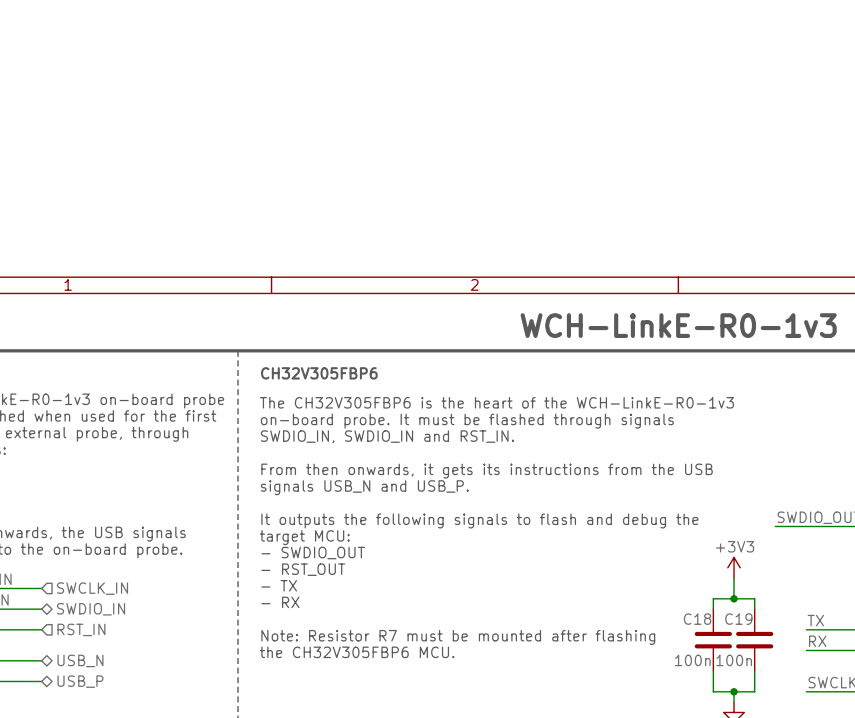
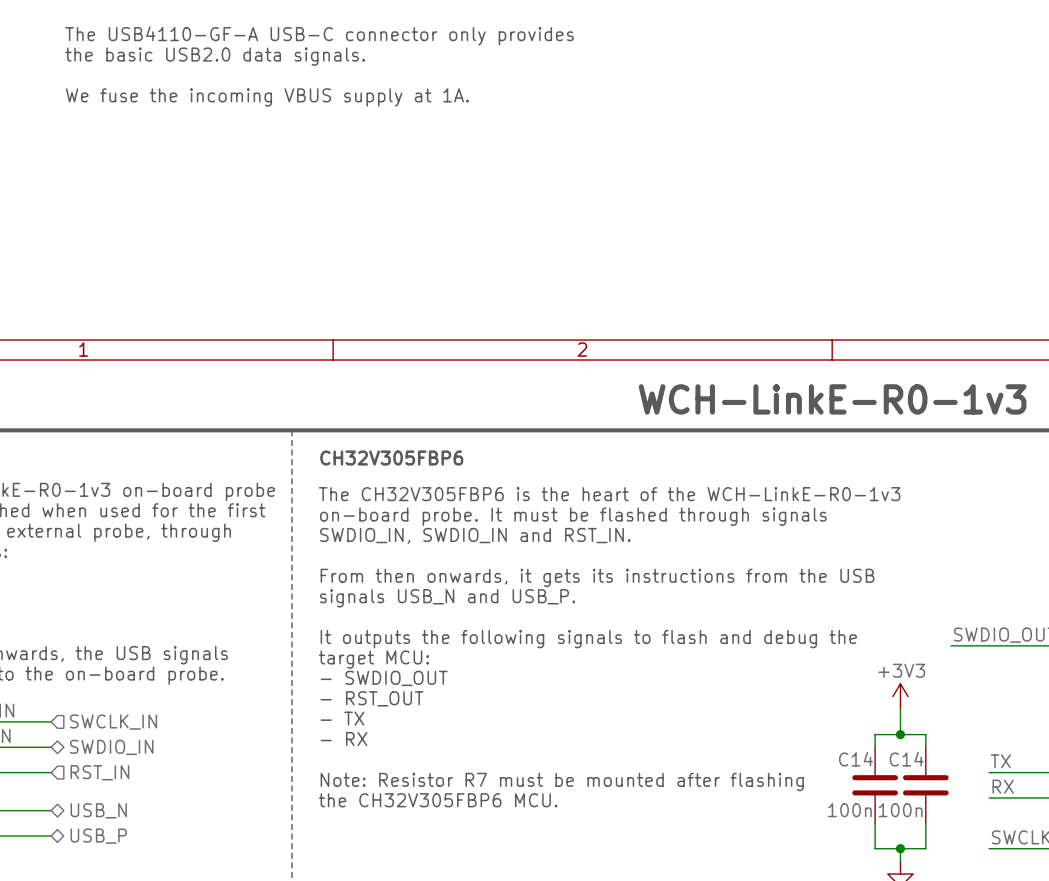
text: none -> The USB4110-GF-A USB-C connector only provides (319, 35)
text: none -> the basic USB2.0 data signals. (215, 56)
text: none -> We fuse the incoming VBUS supply at 1A. (267, 97)
C18 name: C18 (697, 619) -> C14 (855, 759)
C19 name: C19 (738, 619) -> C14 (906, 759)

